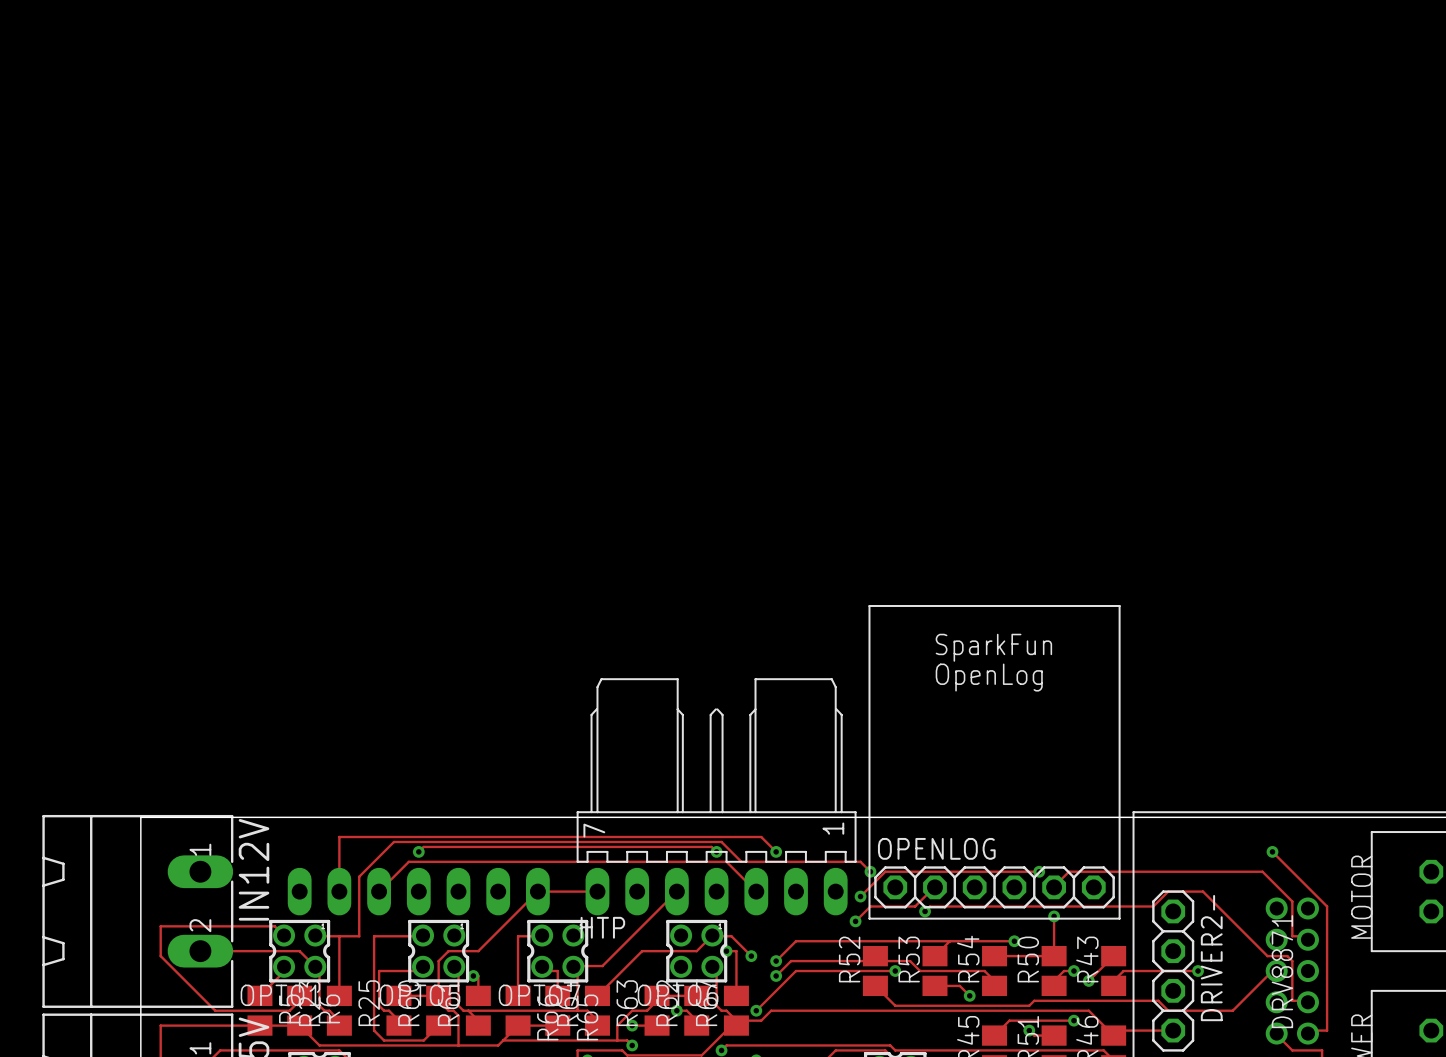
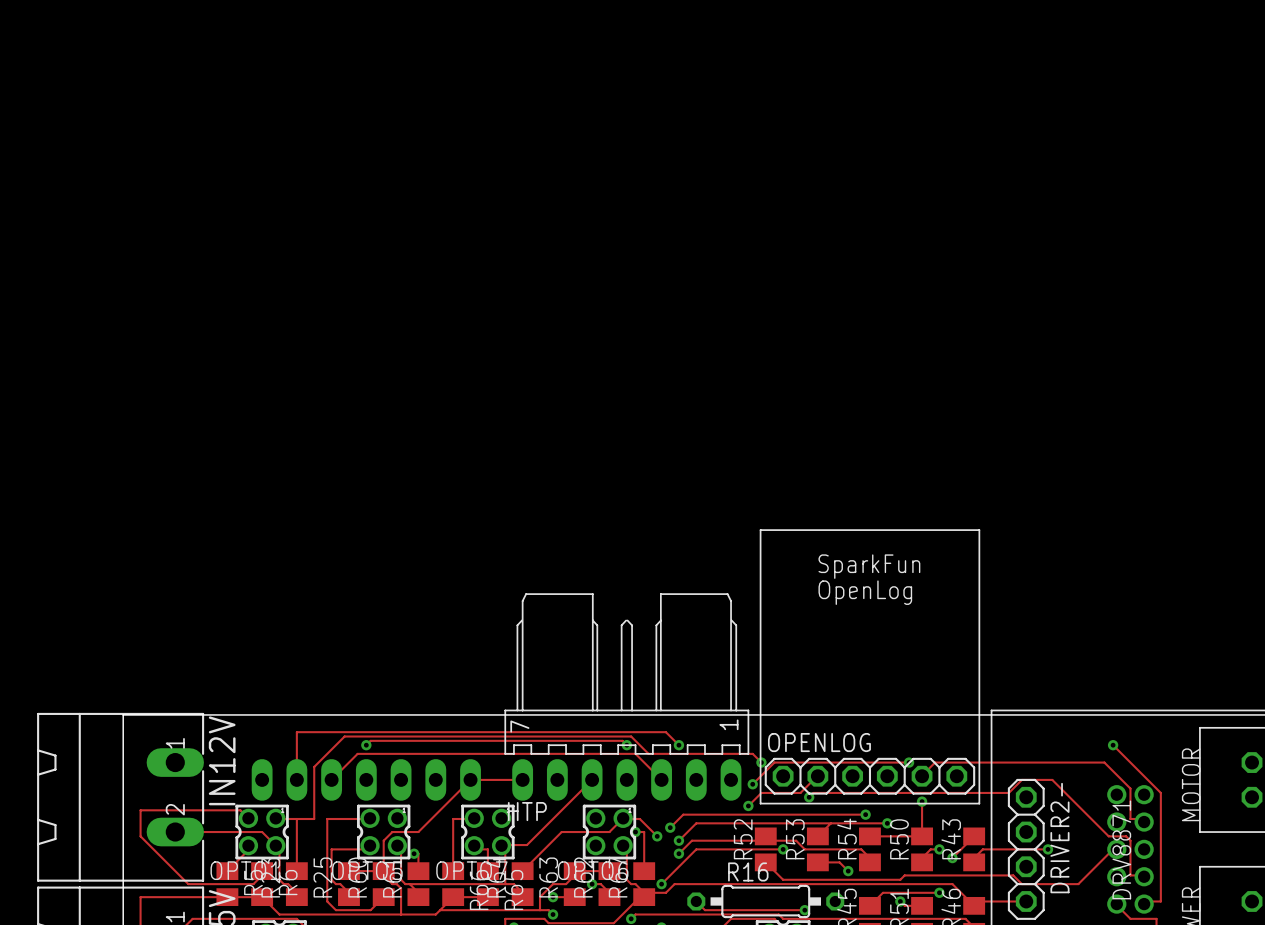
track: none -> (865, 814) (683, 814) (670, 827)
via: none -> (865, 814)
via: none -> (670, 827)
track: none -> (696, 901) (704, 910) (804, 910)
R16: none -> (765, 901)
via: none -> (804, 910)

